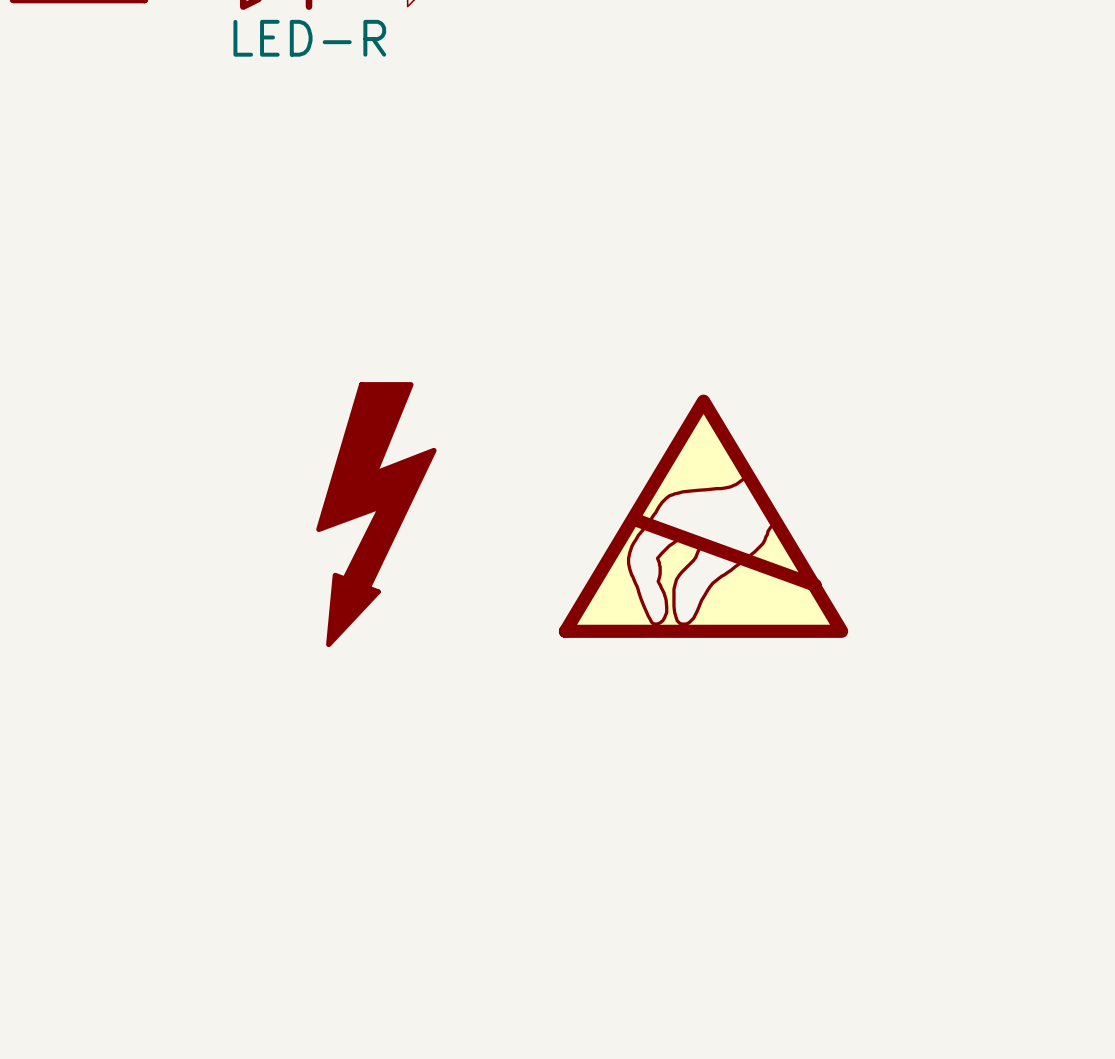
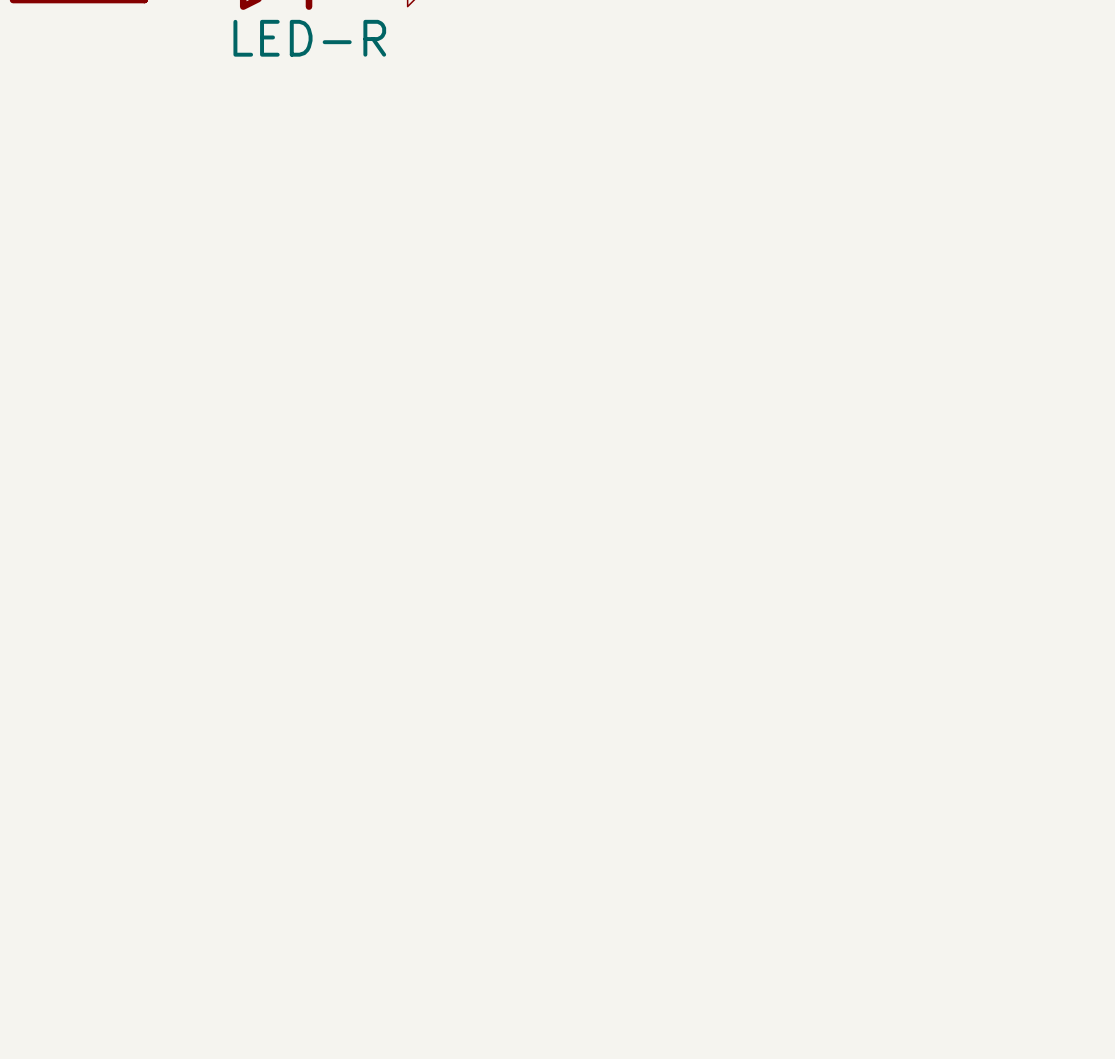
power symbol: (376, 514) -> none
power symbol: (703, 516) -> none

